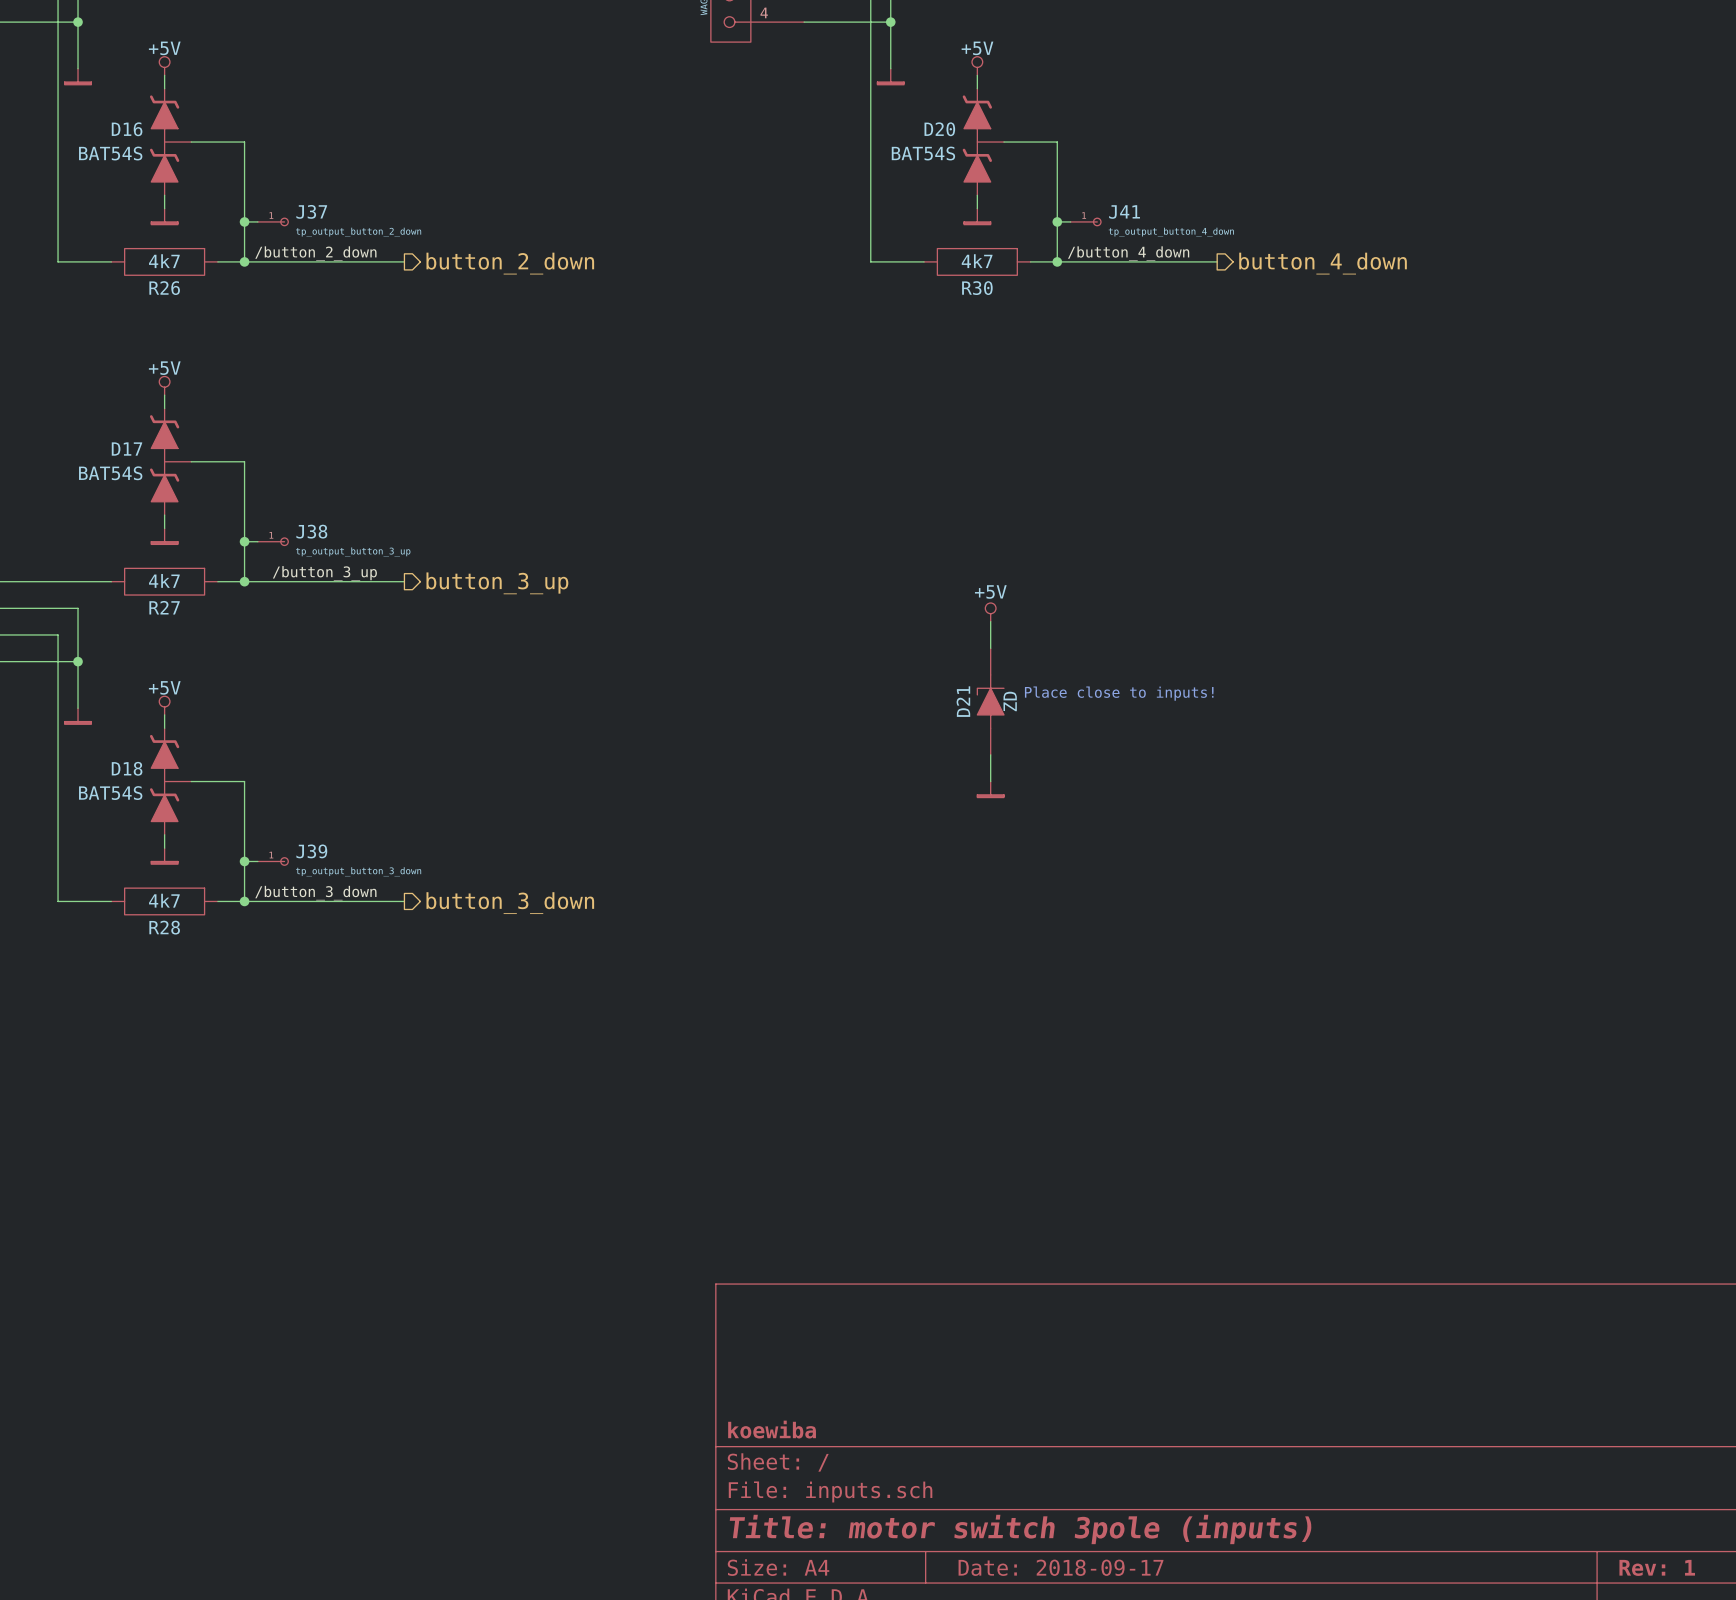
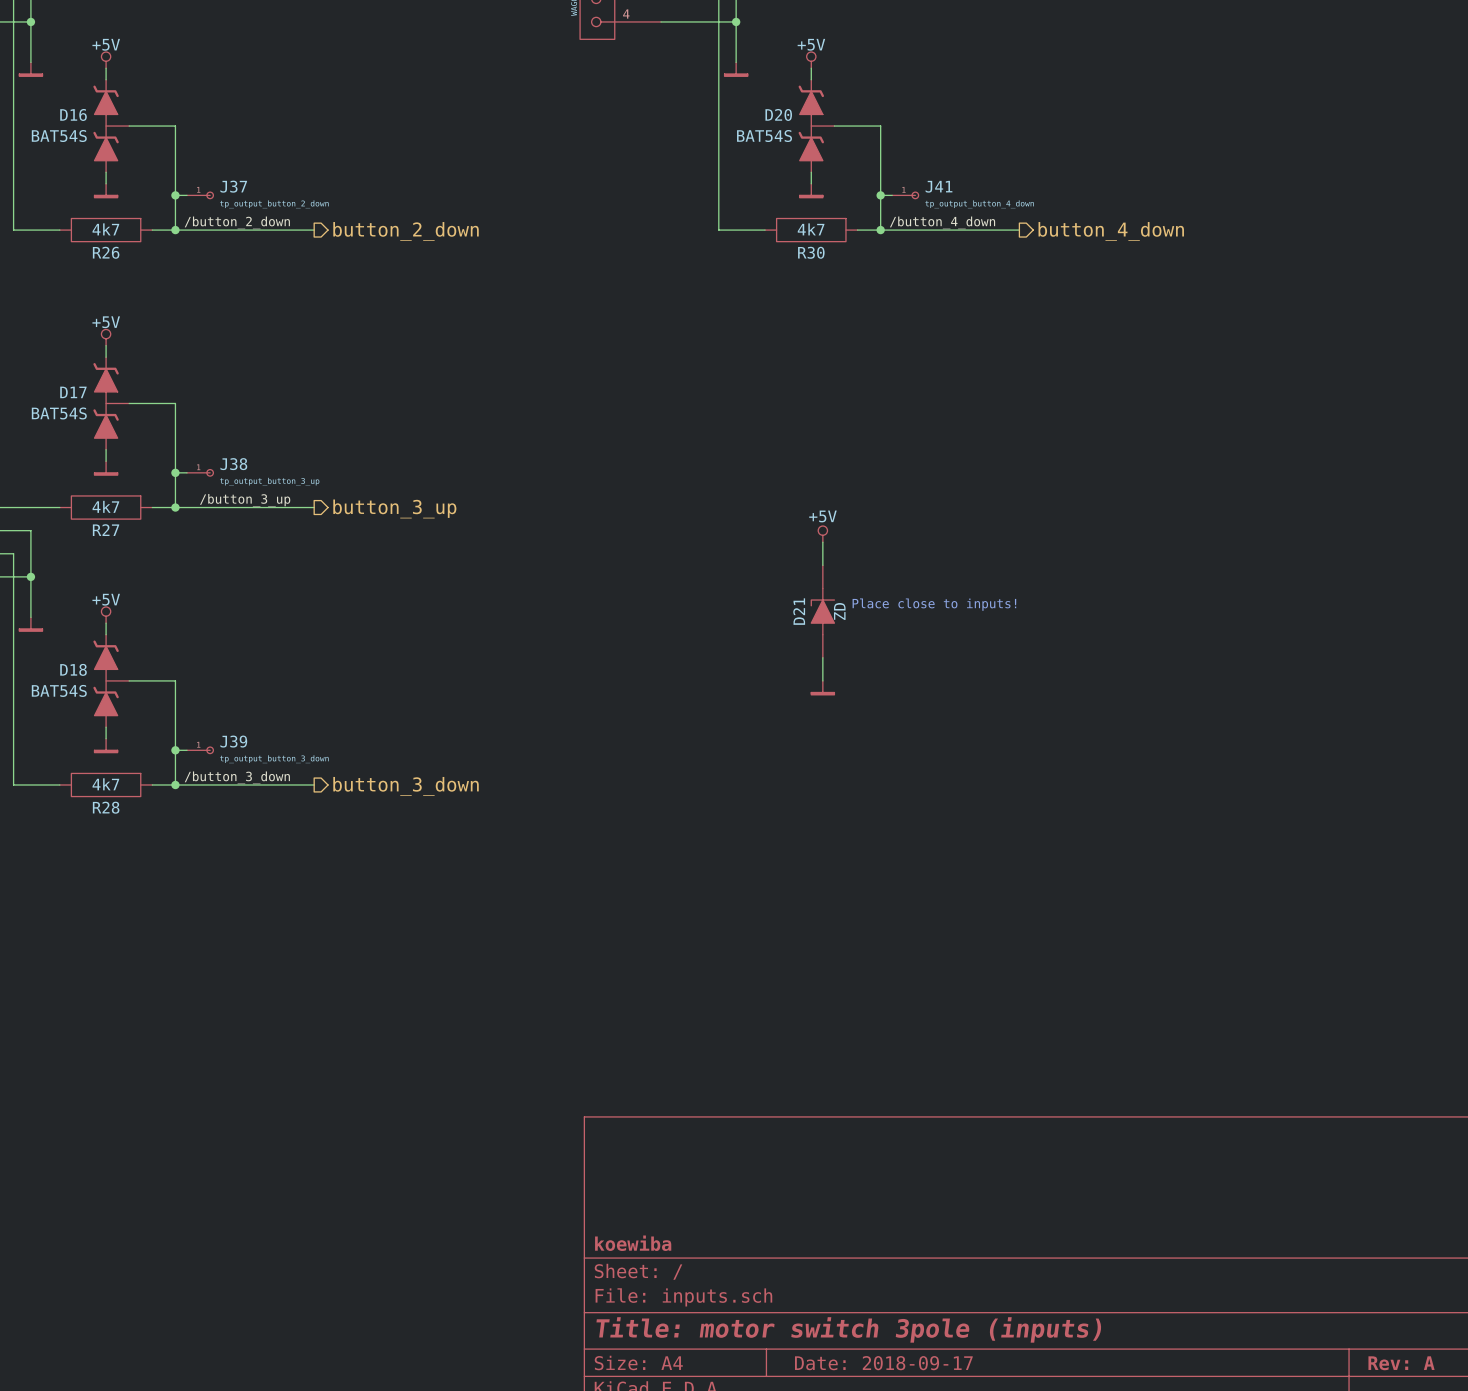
title block: Rev: 1 (1657, 1567) -> Rev: A (1401, 1363)

